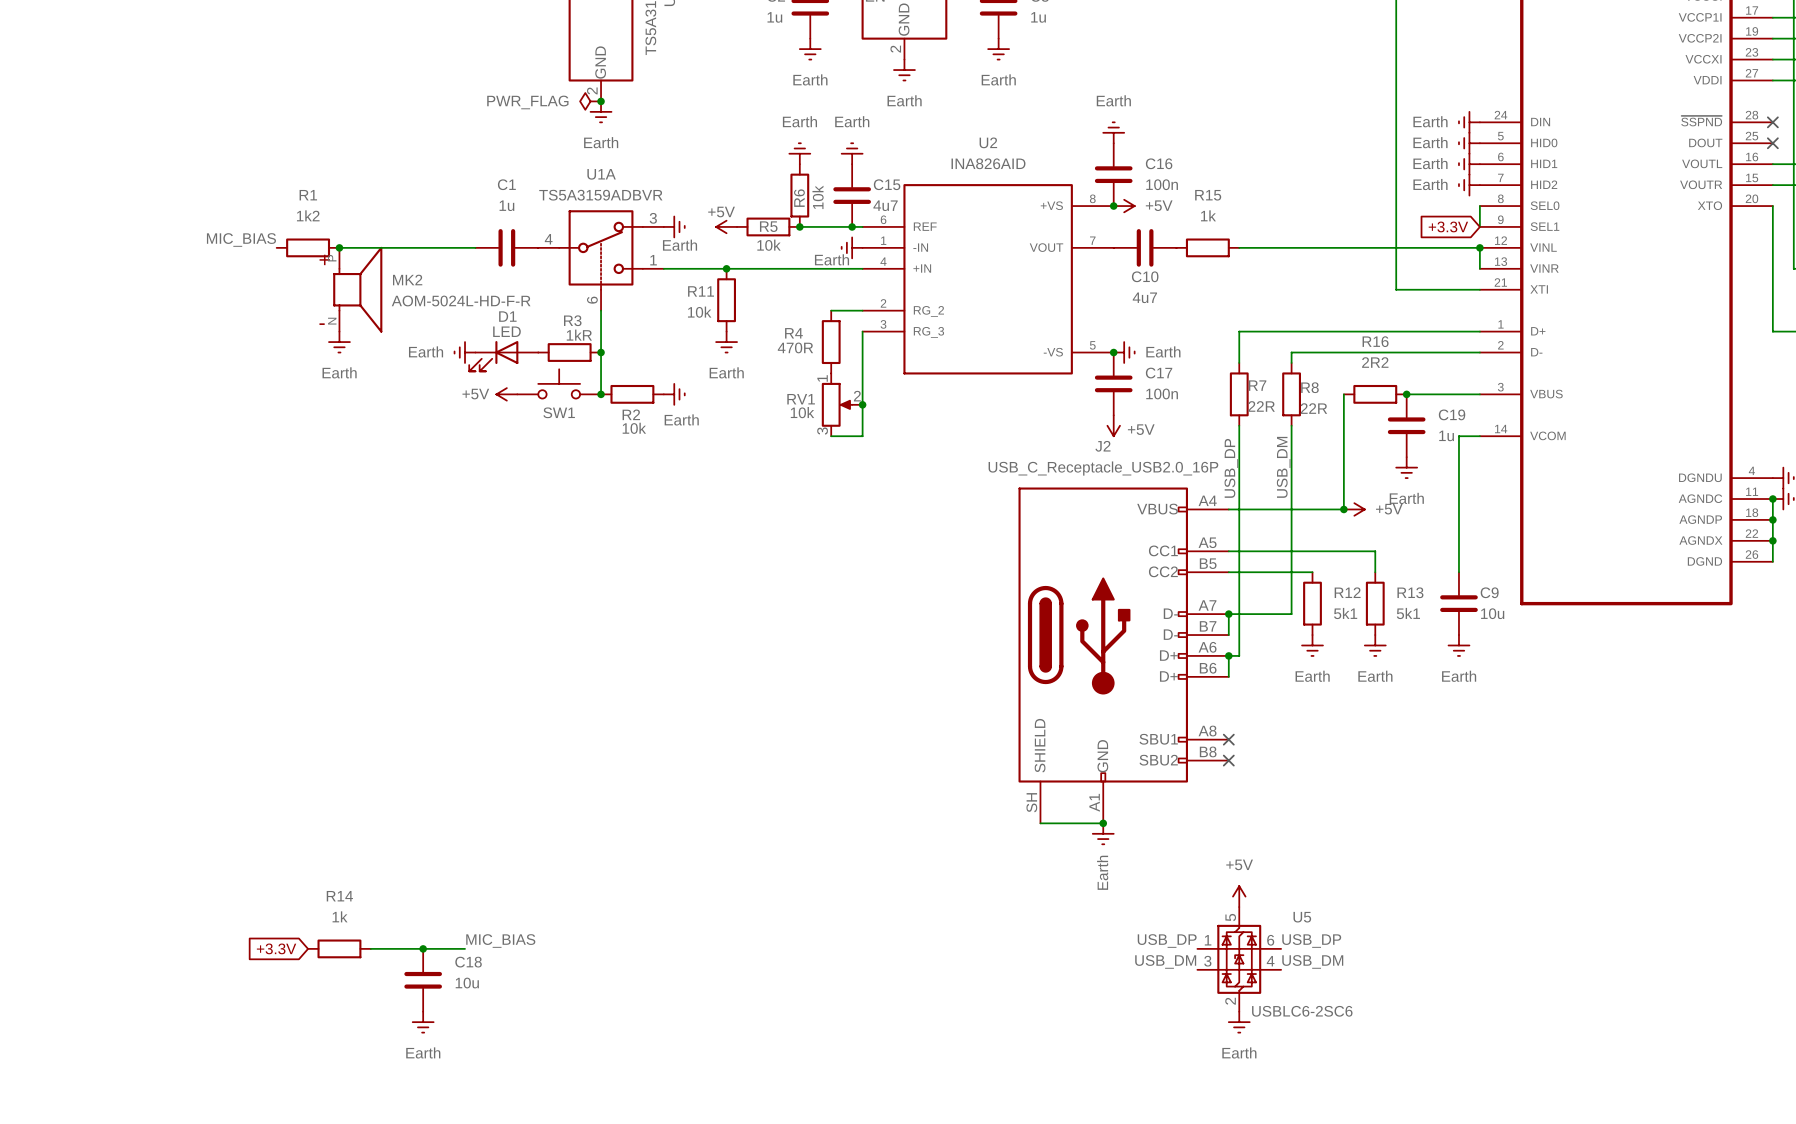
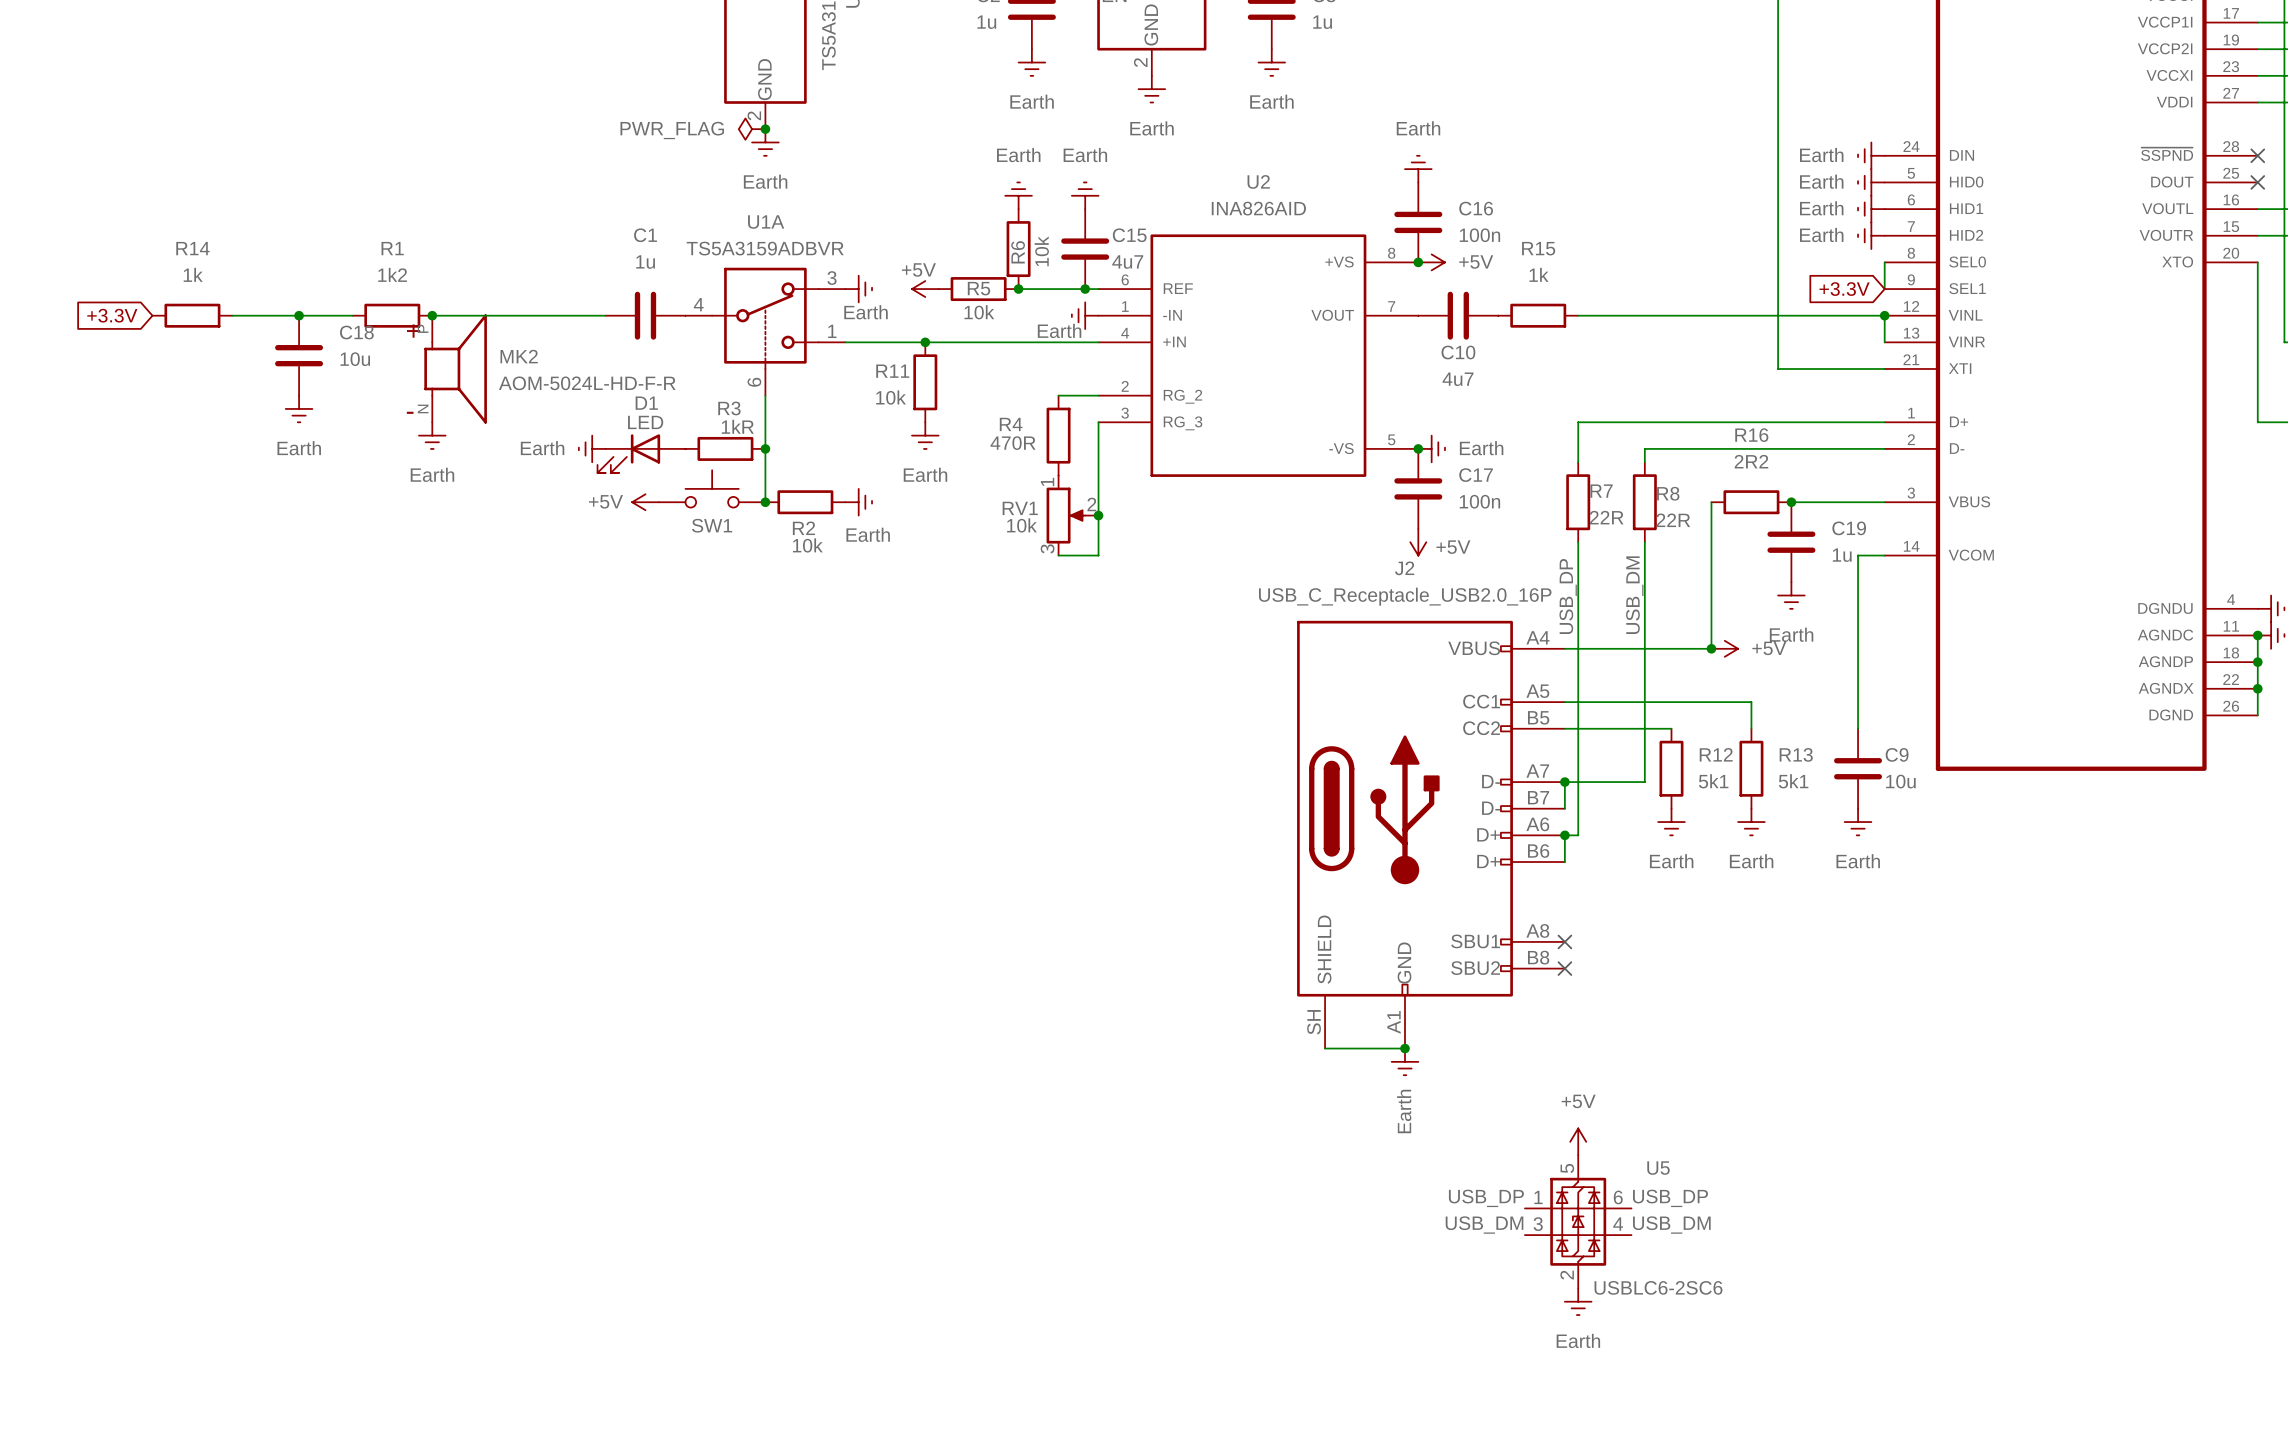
label: MIC_BIAS (241, 239) -> none
global label: none -> +3.3V (112, 315)
wire: none -> (232, 315) (352, 315)
junction: none -> (299, 315)
power symbol: none -> Earth (299, 408)
label: MIC_BIAS (500, 941) -> none
global label: +3.3V (276, 948) -> none
R14 position: (339, 948) -> (192, 315)
wire: (370, 948) (465, 948) -> none
junction: (423, 948) -> none
C18 position: (423, 980) -> (299, 355)
power symbol: Earth (423, 1022) -> none

